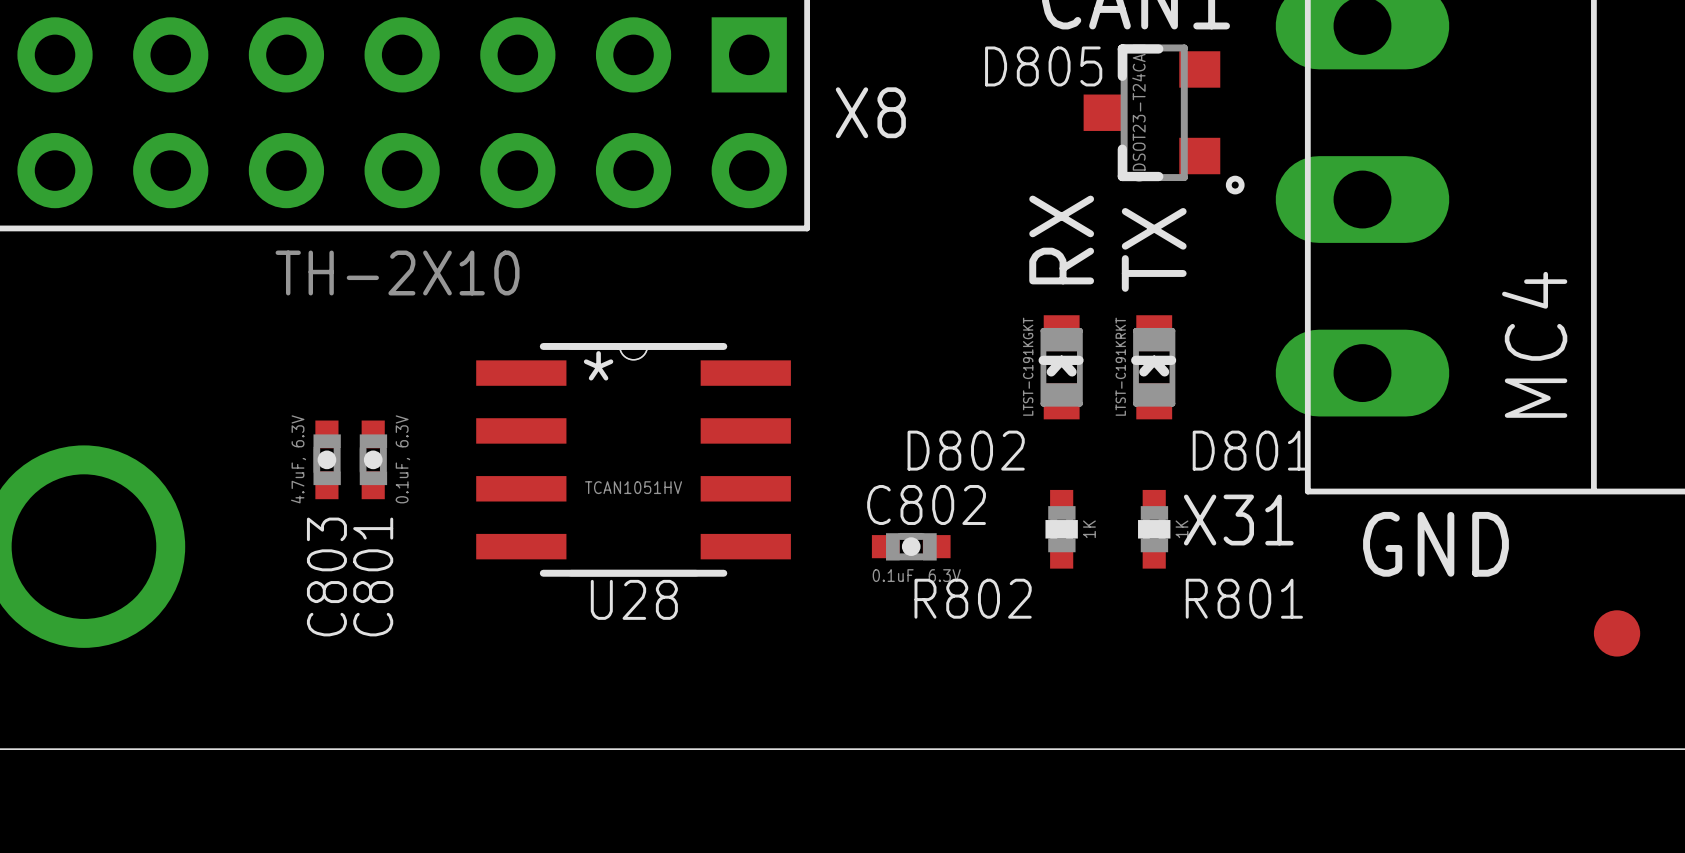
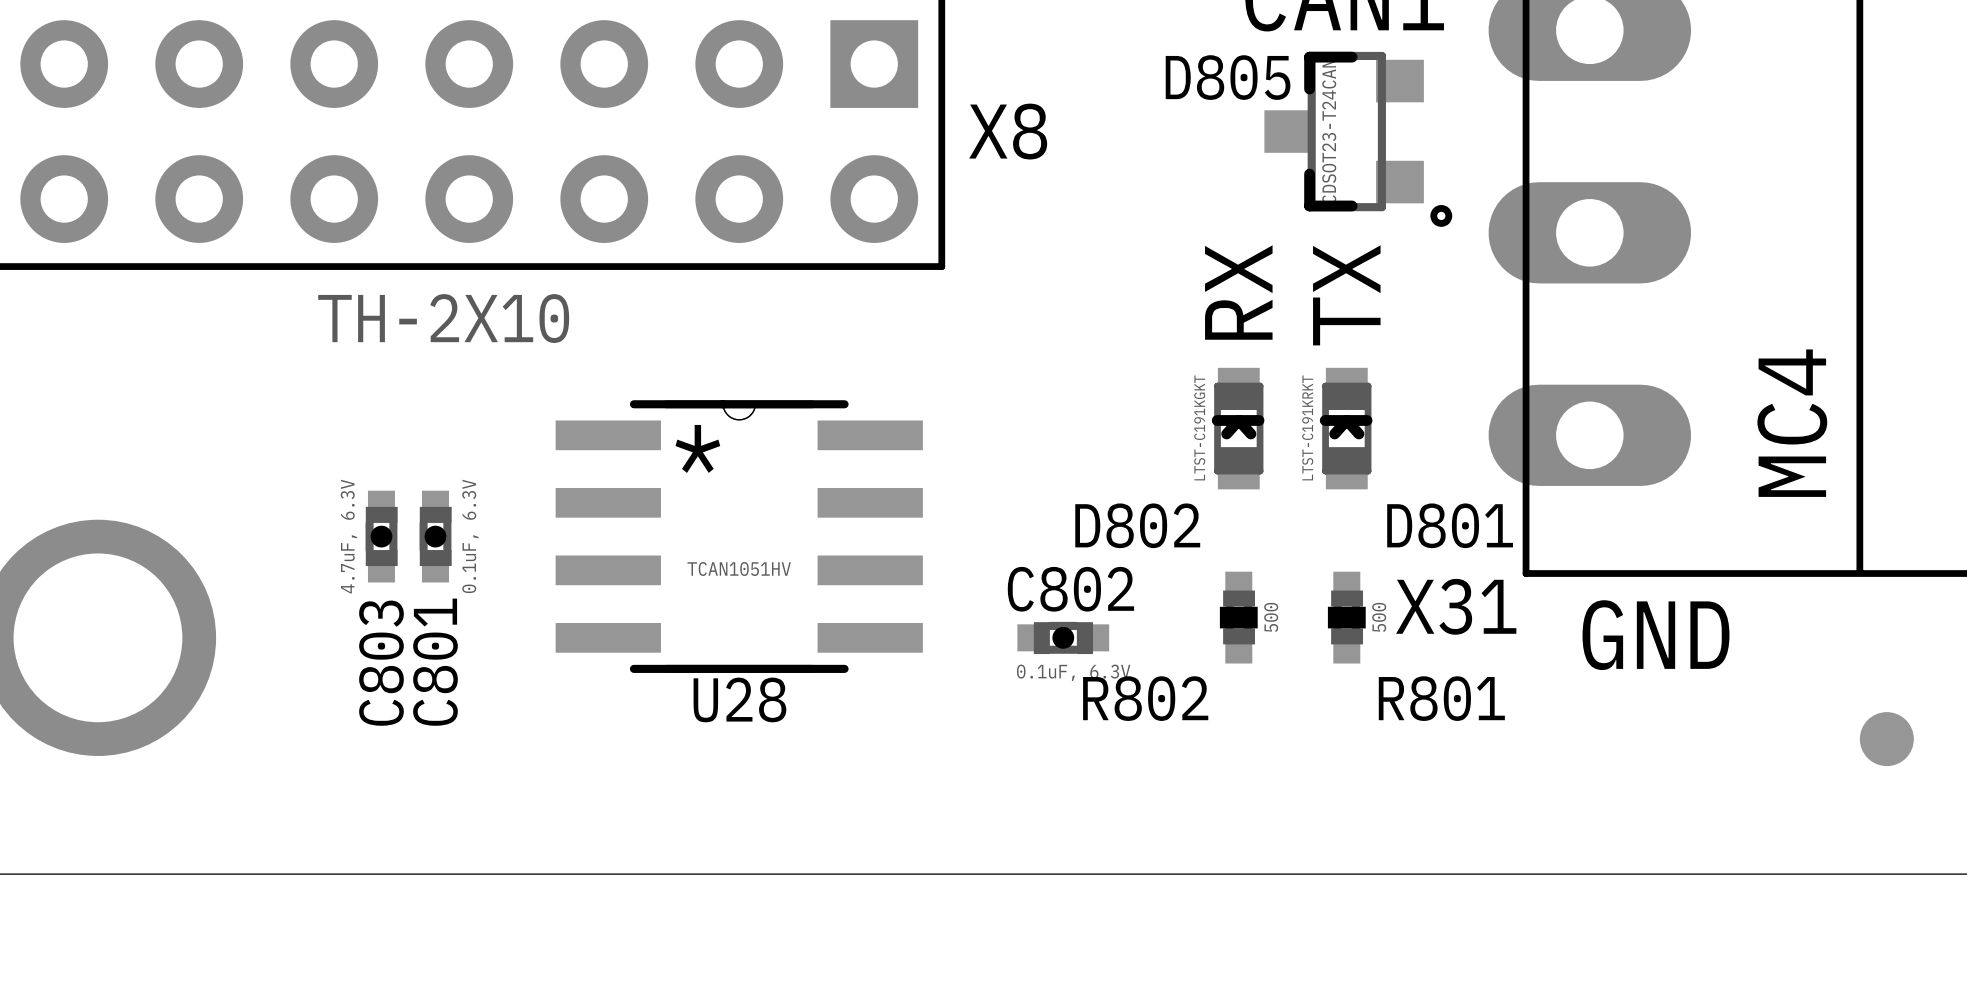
R802 value: 1K (1089, 529) -> 500 (1271, 617)
R801 value: 1K (1181, 529) -> 500 (1379, 617)

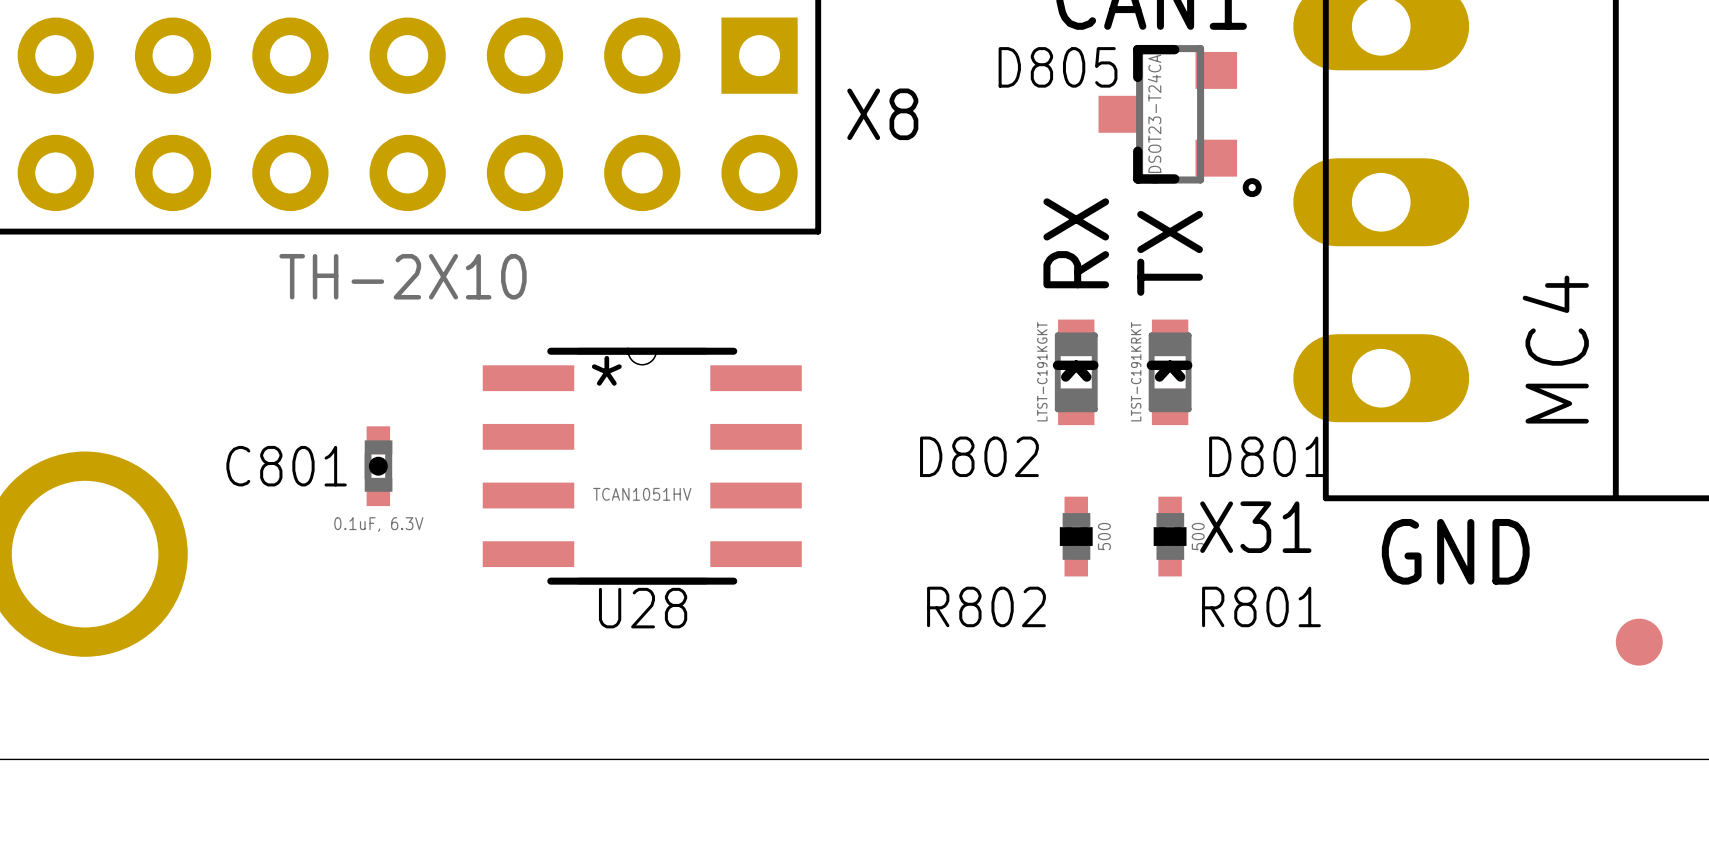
C803: 4.7uF, 6.3V (381, 536) -> none
C801 value rotation: 0° (470, 536) -> 90° clockwise (378, 524)
C802: 0.1uF, 6.3V (1063, 637) -> none
C801 name rotation: 0° (435, 662) -> 90° clockwise (286, 466)
C801 name position: C801 (435, 662) -> C801 (286, 466)

